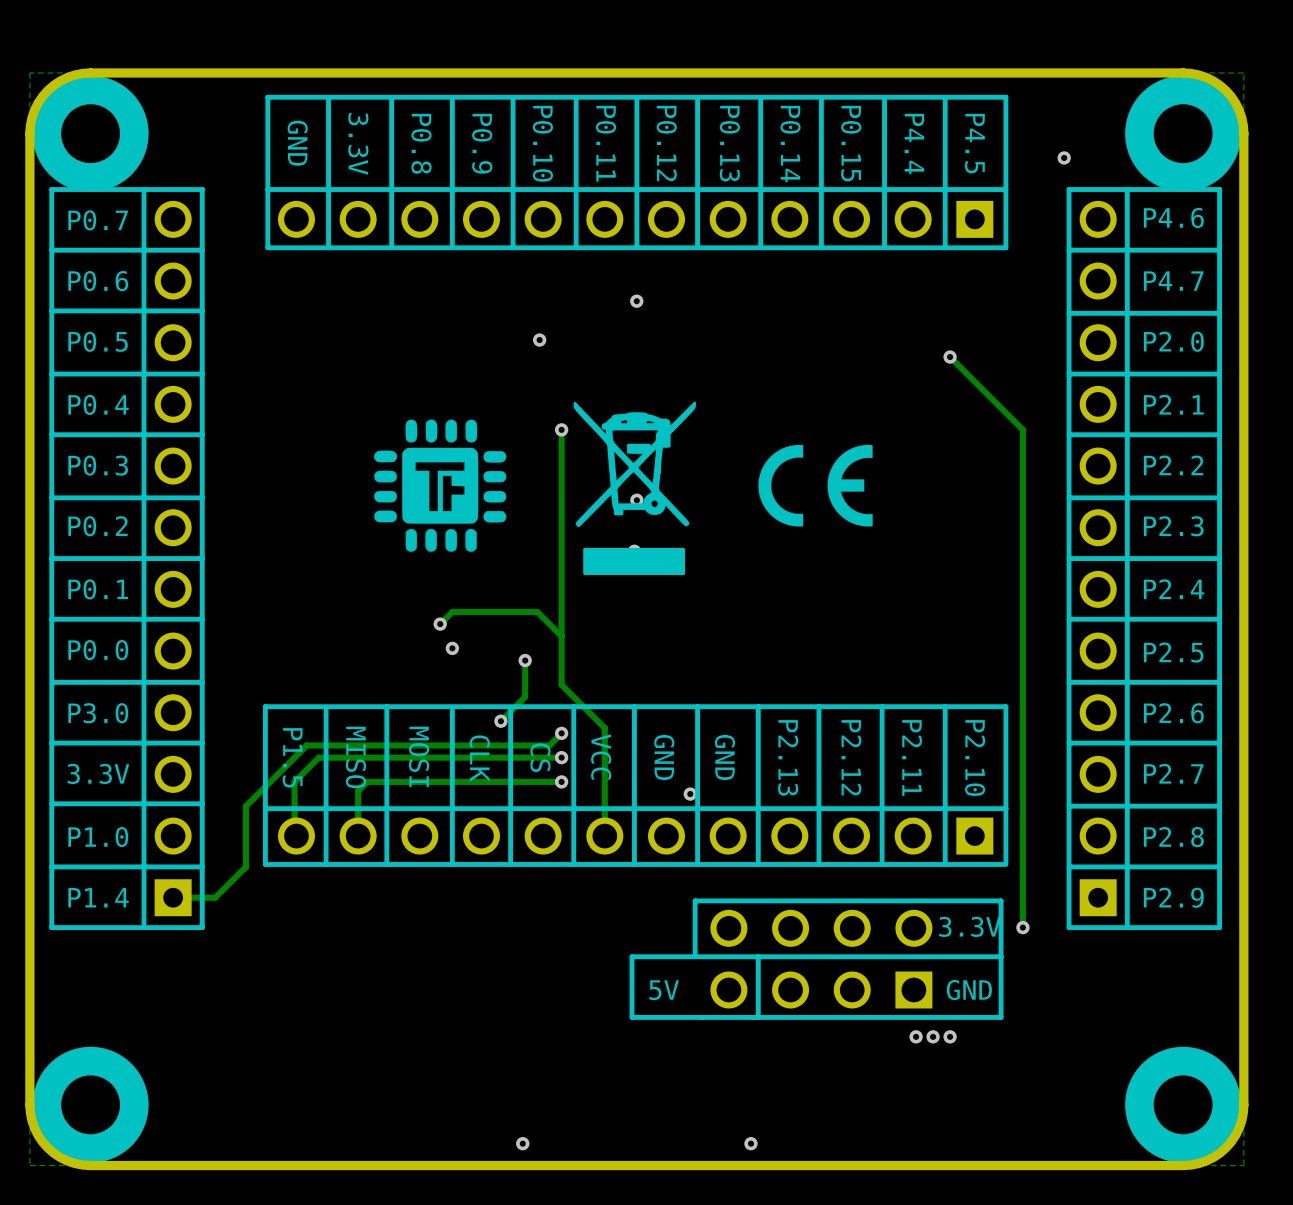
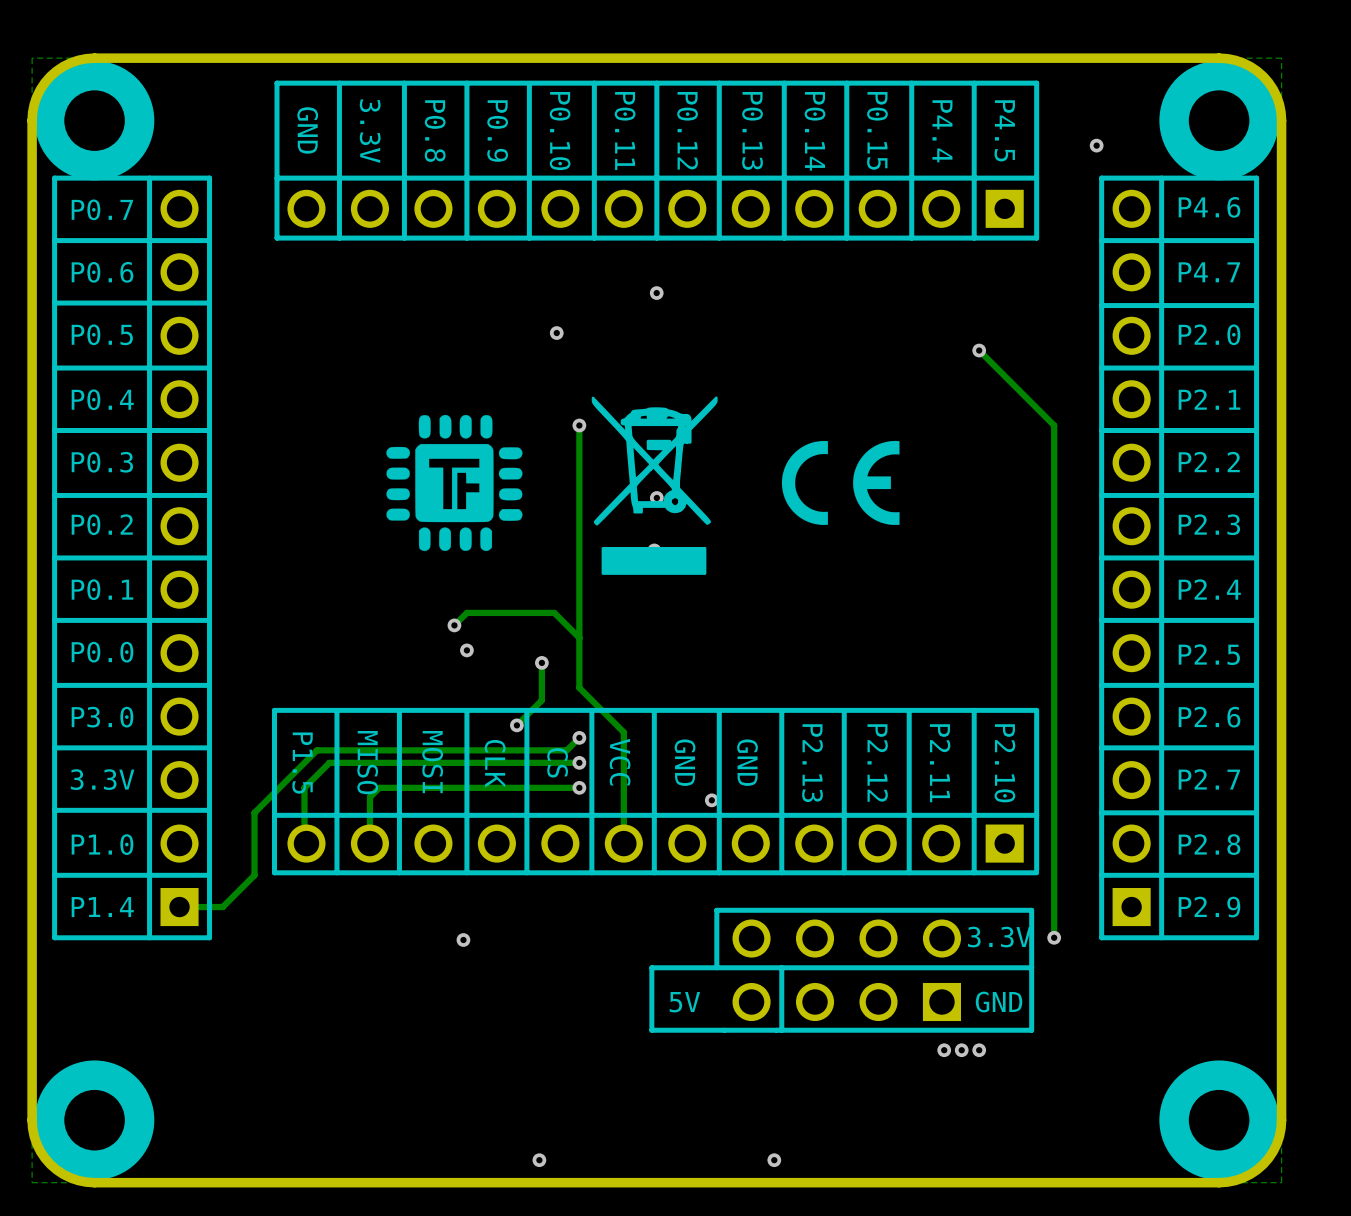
via: none -> (463, 940)

